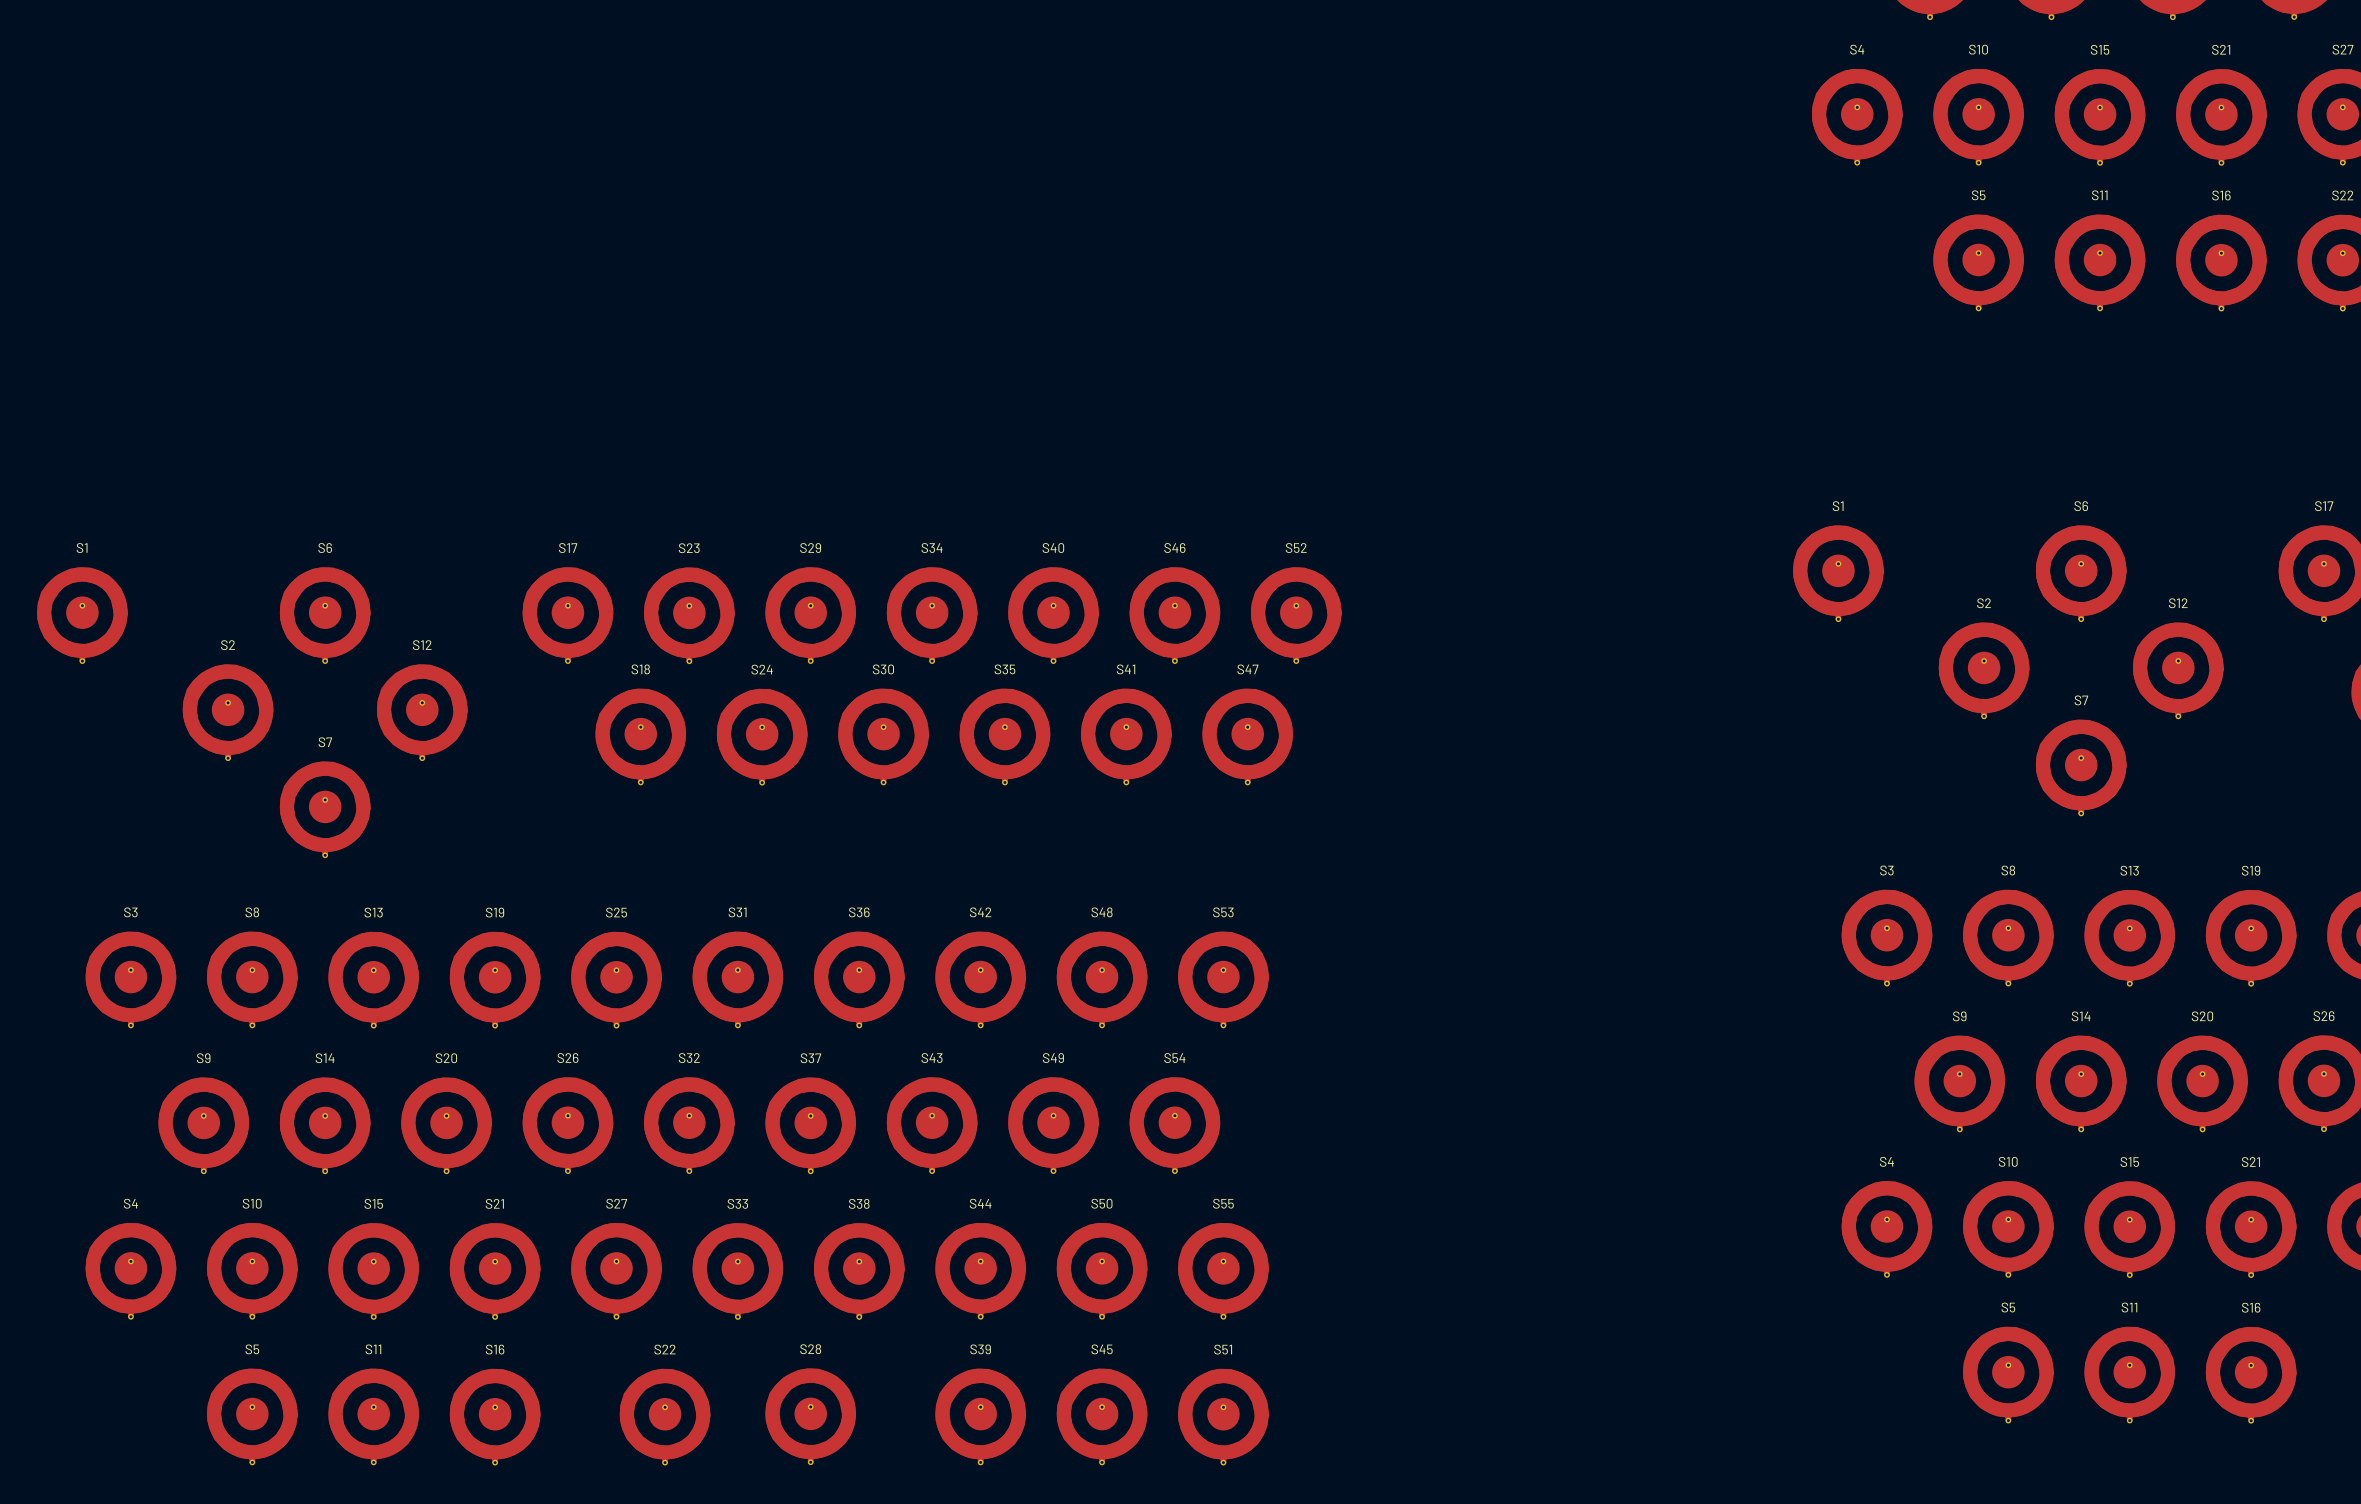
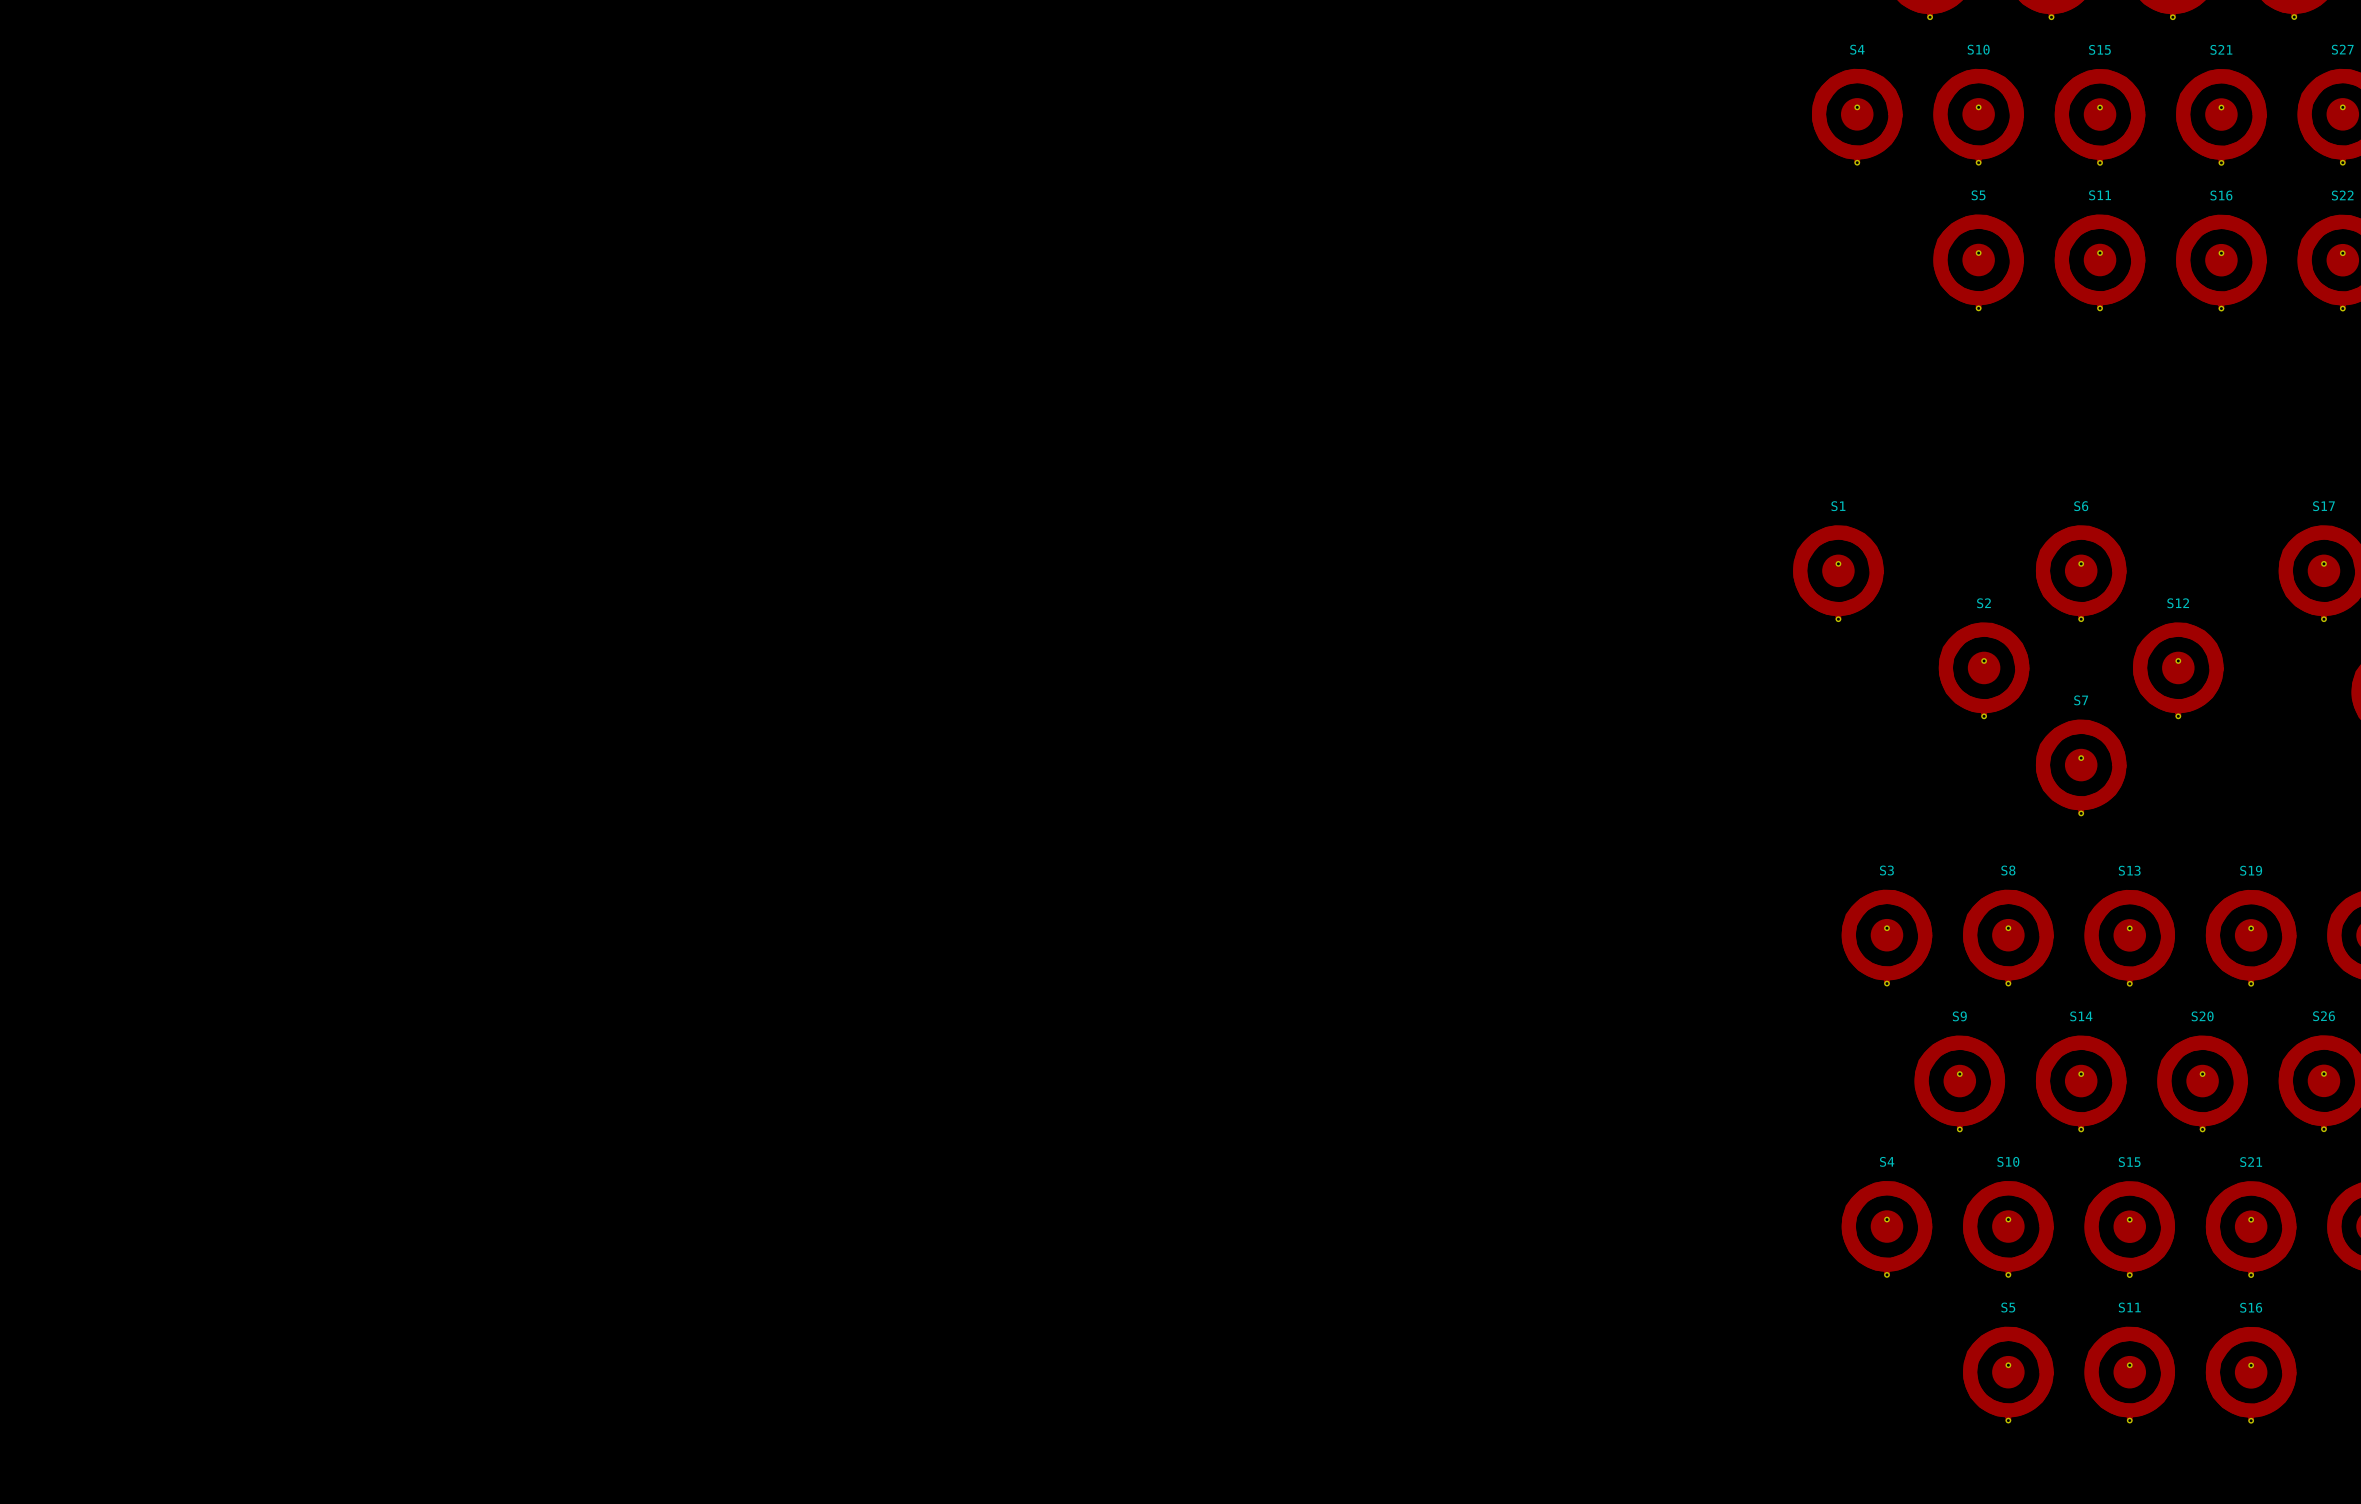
S1: (82, 615) -> none
S6: (325, 615) -> none
S17: (567, 615) -> none
S23: (689, 615) -> none
S29: (810, 615) -> none
S34: (932, 615) -> none
S40: (1053, 615) -> none
S46: (1174, 615) -> none
S52: (1296, 615) -> none
S2: (228, 712) -> none
S12: (422, 712) -> none
S18: (640, 736) -> none
S30: (883, 736) -> none
S35: (1004, 736) -> none
S41: (1126, 736) -> none
S47: (1247, 736) -> none
S24: (762, 737) -> none
S7: (325, 809) -> none
S3: (130, 979) -> none
S8: (252, 979) -> none
S31: (737, 979) -> none
S36: (859, 979) -> none
S42: (980, 979) -> none
S48: (1102, 979) -> none
S53: (1223, 979) -> none
S13: (373, 980) -> none
S19: (495, 980) -> none
S25: (616, 980) -> none
S9: (203, 1125) -> none
S14: (325, 1125) -> none
S20: (446, 1125) -> none
S26: (567, 1125) -> none
S32: (689, 1125) -> none
S37: (810, 1125) -> none
S43: (932, 1125) -> none
S49: (1053, 1125) -> none
S54: (1174, 1125) -> none
S4: (130, 1271) -> none
S10: (252, 1271) -> none
S15: (373, 1271) -> none
S21: (495, 1271) -> none
S27: (616, 1271) -> none
S33: (737, 1271) -> none
S38: (859, 1271) -> none
S44: (980, 1271) -> none
S50: (1102, 1271) -> none
S55: (1223, 1271) -> none
S5: (252, 1416) -> none
S11: (373, 1416) -> none
S28: (810, 1416) -> none
S39: (980, 1416) -> none
S45: (1102, 1416) -> none
S16: (495, 1417) -> none
S22: (665, 1417) -> none
S51: (1223, 1417) -> none

